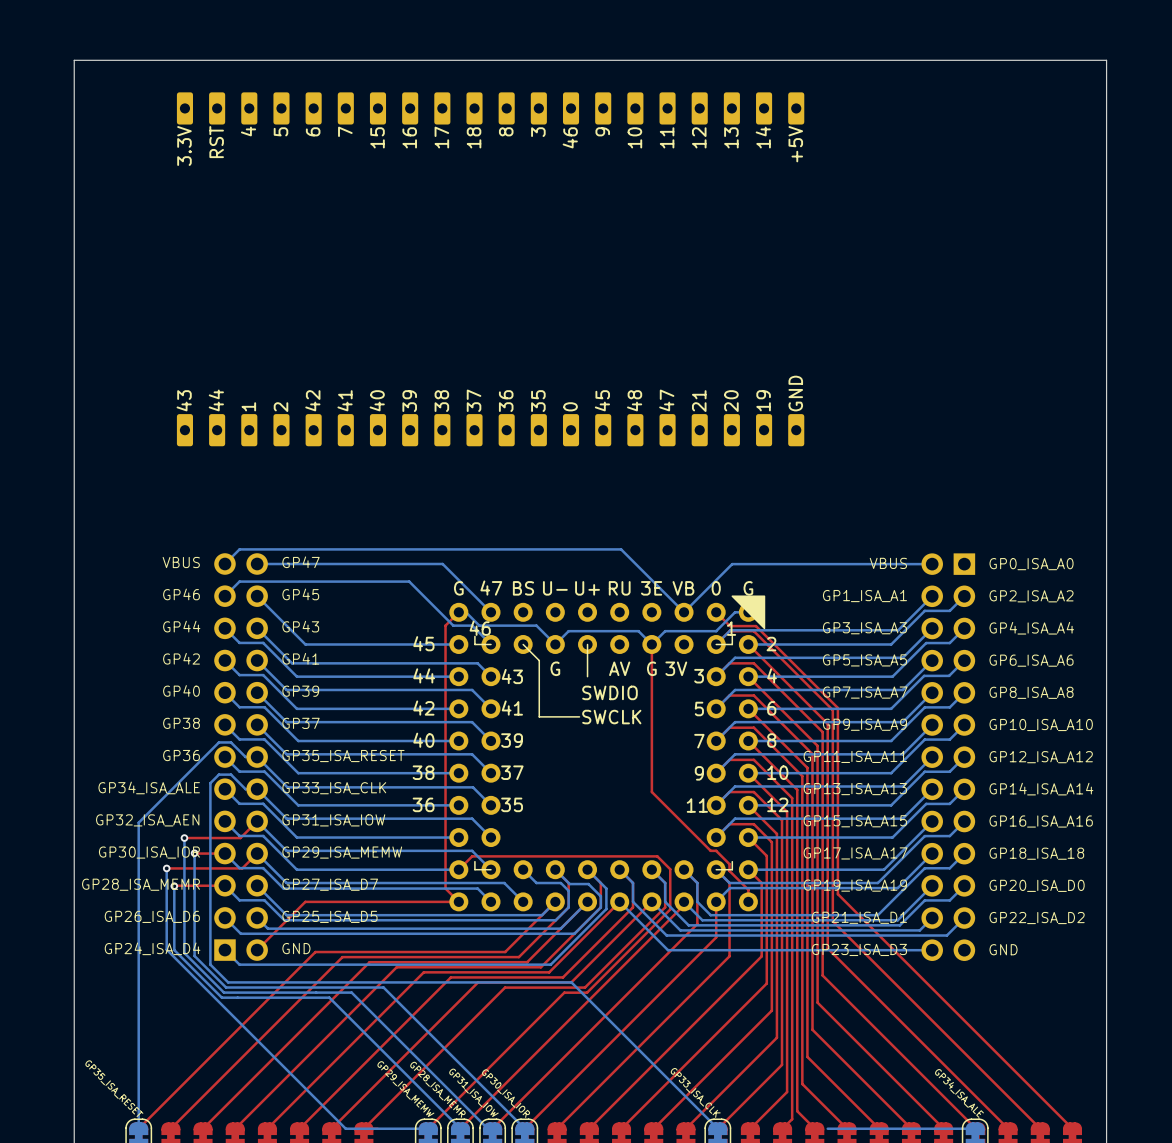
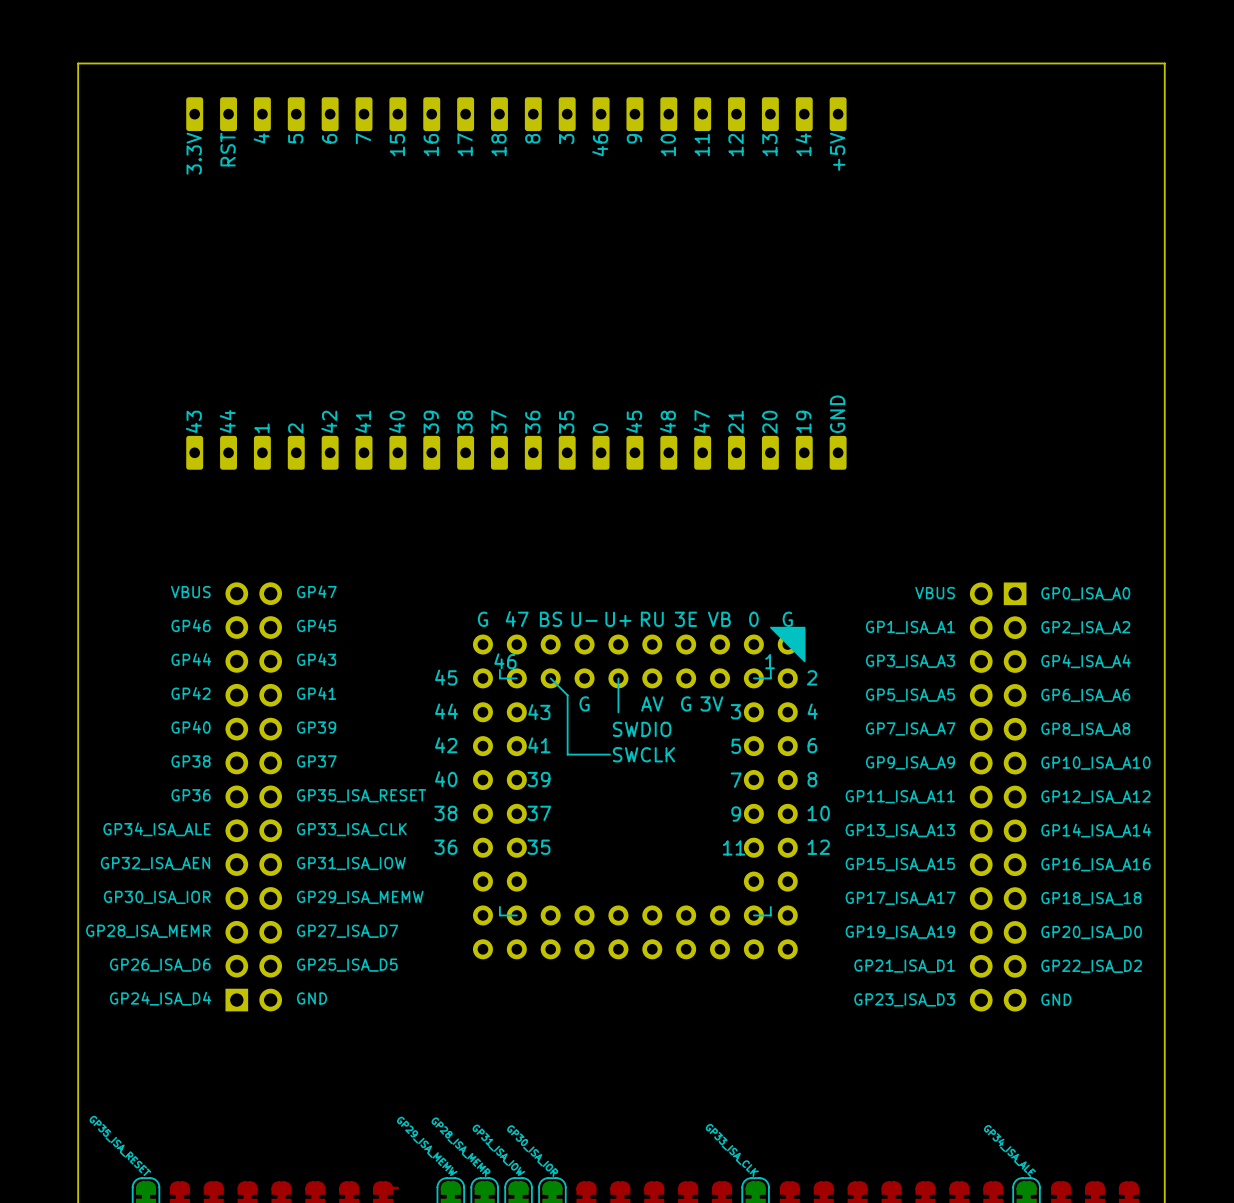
bottom track: (224, 564) (239, 549) (621, 549) (684, 612) (732, 564) (932, 564) -> none
bottom track: (257, 564) (442, 564) (491, 612) -> none
bottom track: (224, 596) (239, 581) (409, 581) (453, 625) (472, 625) (491, 644) -> none
bottom track: (257, 596) (305, 644) (458, 644) -> none
bottom track: (932, 596) (898, 630) (730, 630) (716, 644) -> none
bottom track: (964, 596) (949, 610) (924, 610) (891, 644) (748, 644) -> none
top track: (458, 612) (445, 625) (445, 888) (458, 901) (305, 901) (257, 950) -> none
top track: (716, 612) (730, 626) (756, 626) (837, 707) (837, 894) (1072, 1128) -> none
bottom track: (748, 612) (735, 612) (716, 631) (665, 631) (651, 644) (638, 631) (568, 631) (555, 644) (536, 625) (479, 625) (466, 612) (458, 612) -> none
bottom track: (224, 628) (239, 642) (263, 642) (296, 676) (458, 676) -> none
bottom track: (257, 628) (292, 663) (477, 663) (491, 676) -> none
bottom track: (932, 628) (902, 657) (735, 657) (716, 676) -> none
bottom track: (964, 628) (949, 643) (926, 643) (892, 676) (748, 676) -> none
top track: (651, 644) (651, 792) (710, 850) (716, 850) (729, 864) (729, 870) (748, 889) (748, 901) -> none
top track: (716, 644) (729, 631) (753, 631) (832, 710) (832, 921) (1040, 1128) -> none
top track: (748, 644) (827, 723) (827, 948) (1008, 1128) -> none
bottom track: (224, 660) (239, 675) (263, 675) (296, 708) (458, 708) -> none
bottom track: (257, 660) (286, 689) (472, 689) (491, 708) -> none
bottom track: (932, 660) (902, 689) (735, 689) (716, 708) -> none
bottom track: (964, 660) (949, 675) (924, 675) (891, 708) (748, 708) -> none
top track: (716, 676) (729, 663) (753, 663) (822, 732) (822, 975) (975, 1128) -> none
top track: (748, 676) (817, 745) (817, 1002) (943, 1128) -> none
bottom track: (224, 692) (239, 707) (264, 707) (298, 741) (458, 741) -> none
bottom track: (257, 692) (286, 722) (472, 722) (491, 741) -> none
bottom track: (932, 692) (902, 722) (735, 722) (716, 741) -> none
bottom track: (964, 692) (949, 707) (924, 707) (891, 741) (748, 741) -> none
top track: (716, 708) (729, 695) (753, 695) (812, 754) (812, 1029) (911, 1128) -> none
top track: (748, 708) (807, 767) (807, 1056) (879, 1128) -> none
bottom track: (224, 724) (239, 739) (264, 739) (298, 773) (458, 773) -> none
bottom track: (257, 724) (286, 754) (472, 754) (491, 773) -> none
bottom track: (932, 724) (902, 754) (735, 754) (716, 773) -> none
bottom track: (964, 724) (949, 739) (924, 739) (891, 773) (748, 773) -> none
top track: (716, 741) (729, 727) (753, 727) (802, 776) (802, 1084) (847, 1128) -> none
top track: (748, 741) (797, 789) (797, 1111) (814, 1128) -> none
bottom track: (224, 757) (239, 771) (264, 771) (298, 805) (458, 805) -> none
bottom track: (932, 757) (902, 786) (735, 786) (716, 805) -> none
bottom track: (964, 757) (949, 771) (924, 771) (891, 805) (748, 805) -> none
top track: (716, 773) (729, 759) (753, 759) (792, 798) (792, 1119) (782, 1128) -> none
top track: (748, 773) (787, 811) (787, 1092) (750, 1128) -> none
bottom track: (224, 789) (239, 803) (263, 803) (296, 837) (458, 837) -> none
bottom track: (932, 789) (902, 818) (735, 818) (716, 837) -> none
bottom track: (964, 789) (949, 803) (926, 803) (892, 837) (748, 837) -> none
bottom track: (491, 805) (473, 787) (287, 787) (257, 757) (245, 757) (231, 742) (218, 742) (138, 822) (138, 1128) -> none
top track: (716, 805) (729, 792) (753, 792) (782, 820) (782, 1064) (718, 1128) -> none
top track: (748, 805) (776, 833) (776, 1037) (685, 1128) -> none
bottom track: (224, 821) (239, 835) (263, 835) (296, 869) (458, 869) -> none
bottom track: (257, 821) (286, 850) (472, 850) (491, 869) -> none
top track: (257, 821) (240, 838) (184, 838) -> none
bottom track: (932, 821) (884, 869) (748, 869) -> none
bottom track: (964, 821) (949, 836) (924, 836) (877, 883) (729, 883) (716, 869) -> none
bottom track: (491, 837) (472, 818) (286, 818) (257, 789) (245, 789) (231, 774) (218, 774) (210, 783) (210, 964) (228, 982) (571, 982) (717, 1128) -> none
top track: (716, 837) (729, 824) (753, 824) (771, 842) (771, 1010) (653, 1128) -> none
top track: (748, 837) (766, 855) (766, 983) (621, 1128) -> none
bottom track: (184, 838) (184, 953) (223, 992) (351, 992) (487, 1128) (492, 1128) -> none
via: (184, 838) -> none
bottom track: (194, 853) (194, 956) (226, 987) (383, 987) (524, 1128) -> none
top track: (194, 853) (224, 853) -> none
via: (194, 853) -> none
bottom track: (224, 853) (239, 868) (263, 868) (283, 888) (477, 888) (491, 901) -> none
bottom track: (257, 853) (286, 883) (504, 883) (523, 901) -> none
top track: (257, 853) (242, 868) (166, 868) -> none
bottom track: (932, 853) (897, 888) (730, 888) (716, 901) -> none
bottom track: (964, 853) (949, 868) (924, 868) (877, 915) (710, 915) (697, 901) (697, 883) (684, 869) -> none
bottom track: (166, 868) (166, 949) (345, 1128) (428, 1128) -> none
via: (166, 868) -> none
top track: (458, 869) (472, 856) (657, 856) (670, 869) (670, 909) (587, 992) (564, 992) (428, 1128) -> none
bottom track: (523, 869) (536, 883) (560, 883) (568, 890) (568, 907) (555, 920) (284, 920) (264, 900) (239, 900) (224, 885) -> none
bottom track: (555, 869) (569, 884) (588, 884) (600, 896) (600, 907) (574, 933) (240, 933) (224, 917) -> none
top track: (555, 869) (568, 883) (568, 907) (518, 957) (342, 957) (170, 1128) -> none
bottom track: (587, 869) (606, 888) (606, 909) (550, 964) (239, 964) (224, 950) -> none
top track: (587, 869) (600, 883) (600, 907) (540, 967) (396, 967) (235, 1128) -> none
bottom track: (619, 869) (633, 883) (633, 901) (666, 935) (946, 935) (964, 918) -> none
top track: (619, 869) (633, 883) (633, 907) (562, 977) (450, 977) (299, 1128) -> none
bottom track: (651, 869) (665, 883) (665, 901) (688, 925) (899, 925) (924, 900) (949, 900) (964, 885) -> none
top track: (651, 869) (665, 883) (665, 907) (584, 987) (505, 987) (363, 1128) -> none
top track: (684, 869) (697, 883) (697, 924) (492, 1128) -> none
top track: (716, 869) (729, 883) (729, 956) (557, 1128) -> none
top track: (748, 869) (761, 883) (761, 956) (589, 1128) -> none
top track: (224, 885) (174, 886) -> none
bottom track: (257, 885) (286, 915) (542, 915) (555, 901) -> none
bottom track: (932, 885) (897, 920) (702, 920) (684, 901) -> none
bottom track: (174, 886) (174, 950) (221, 997) (329, 997) (460, 1128) -> none
via: (174, 886) -> none
top track: (555, 901) (505, 952) (315, 952) (138, 1128) -> none
bottom track: (587, 901) (560, 928) (267, 928) (257, 917) -> none
top track: (587, 901) (527, 962) (369, 962) (203, 1128) -> none
bottom track: (619, 901) (668, 950) (932, 950) -> none
top track: (619, 901) (549, 972) (423, 972) (267, 1128) -> none
bottom track: (651, 901) (680, 930) (919, 930) (932, 918) -> none
top track: (651, 901) (571, 982) (477, 982) (331, 1128) -> none
top track: (684, 901) (684, 905) (460, 1128) -> none
top track: (716, 901) (716, 937) (524, 1128) -> none
bottom track: (975, 1128) (827, 1128) -> none

